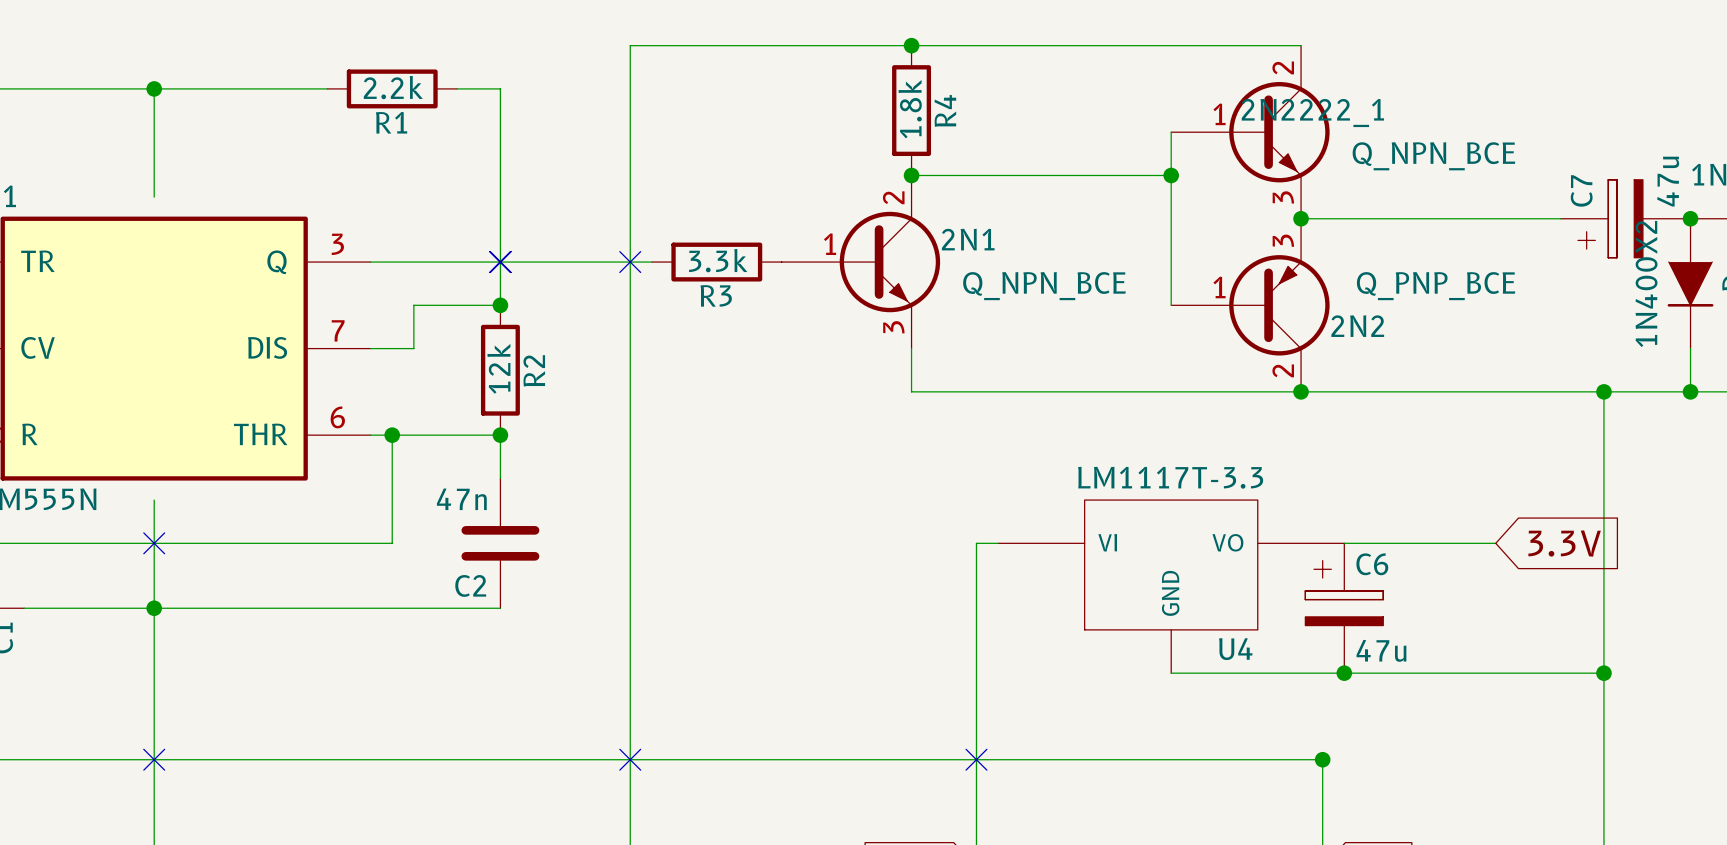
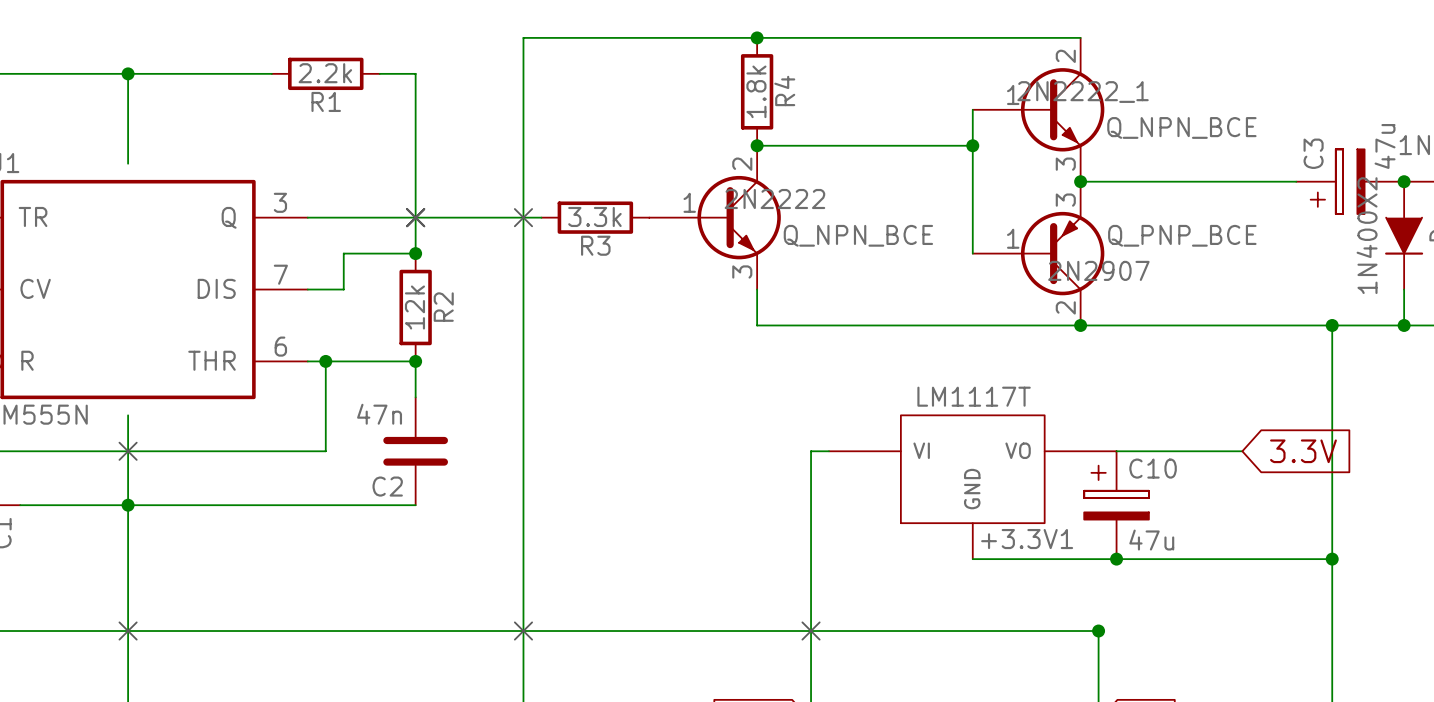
C7 name: C7 (1581, 190) -> C3 (1313, 153)
2N1 name: 2N1 (968, 239) -> 2N2222 (774, 199)
2N2 name: 2N2 (1357, 326) -> 2N2907 (1098, 270)
U4 value: LM1117T-3.3 (1170, 477) -> LM1117T (974, 396)
C6 name: C6 (1372, 564) -> C10 (1153, 468)
U4 name: U4 (1235, 649) -> +3.3V1 (1027, 539)

